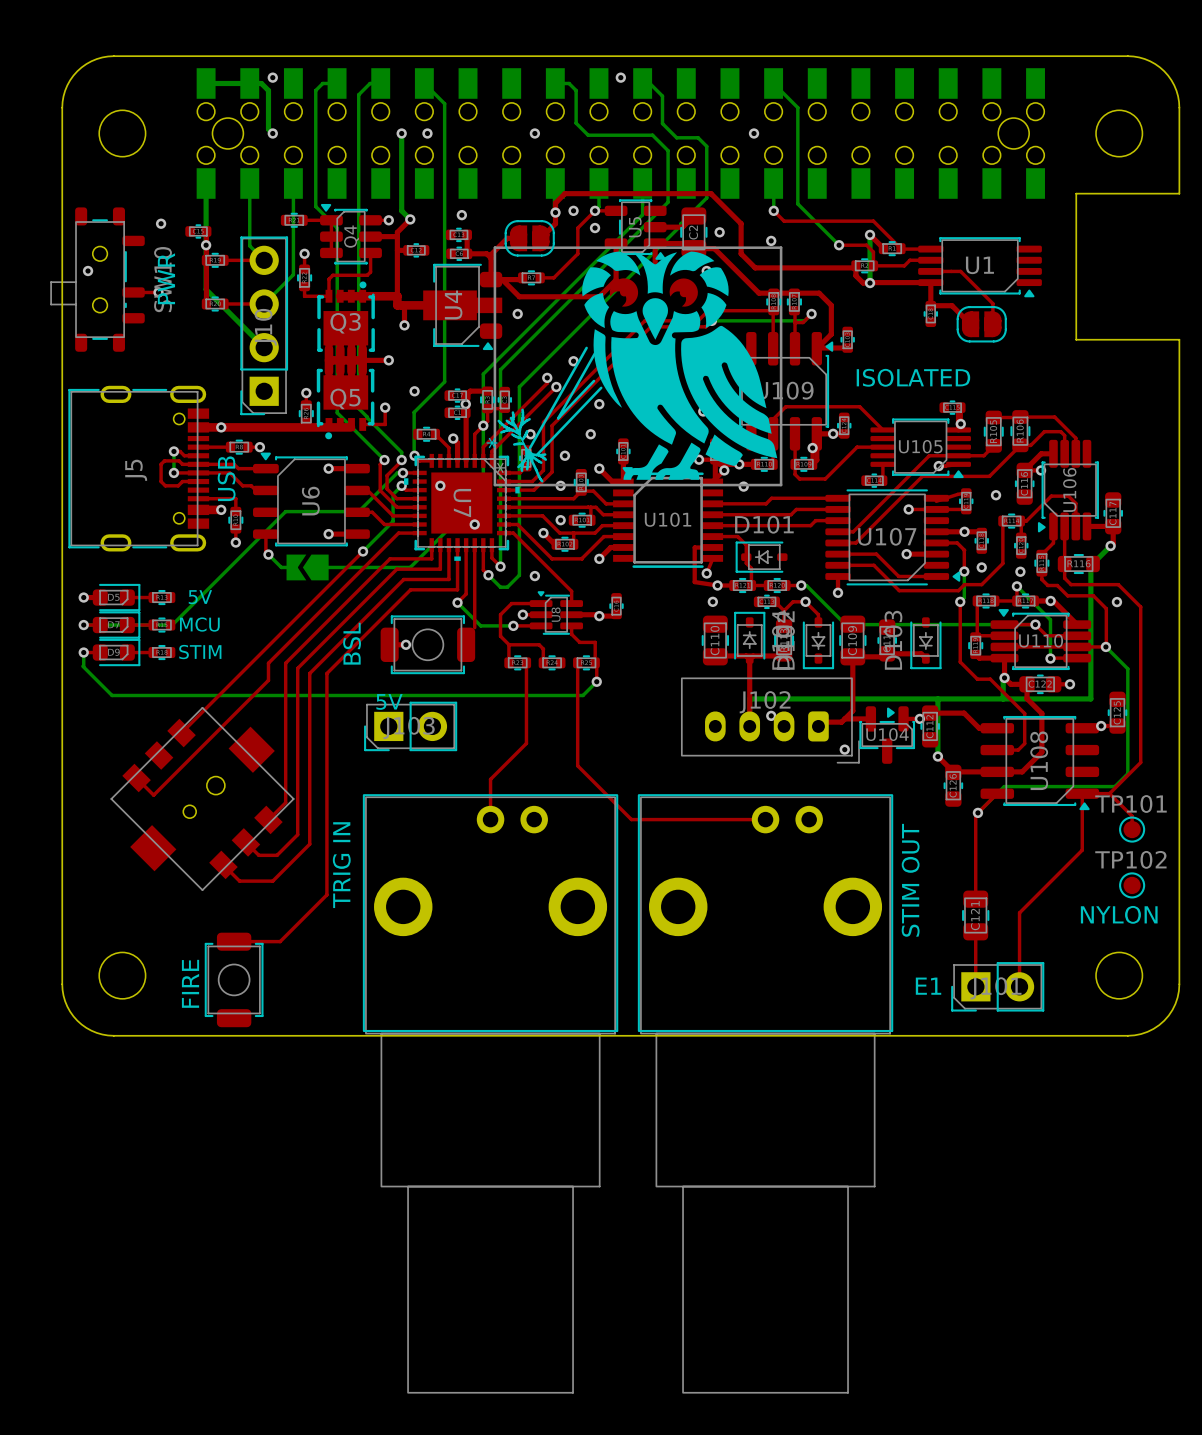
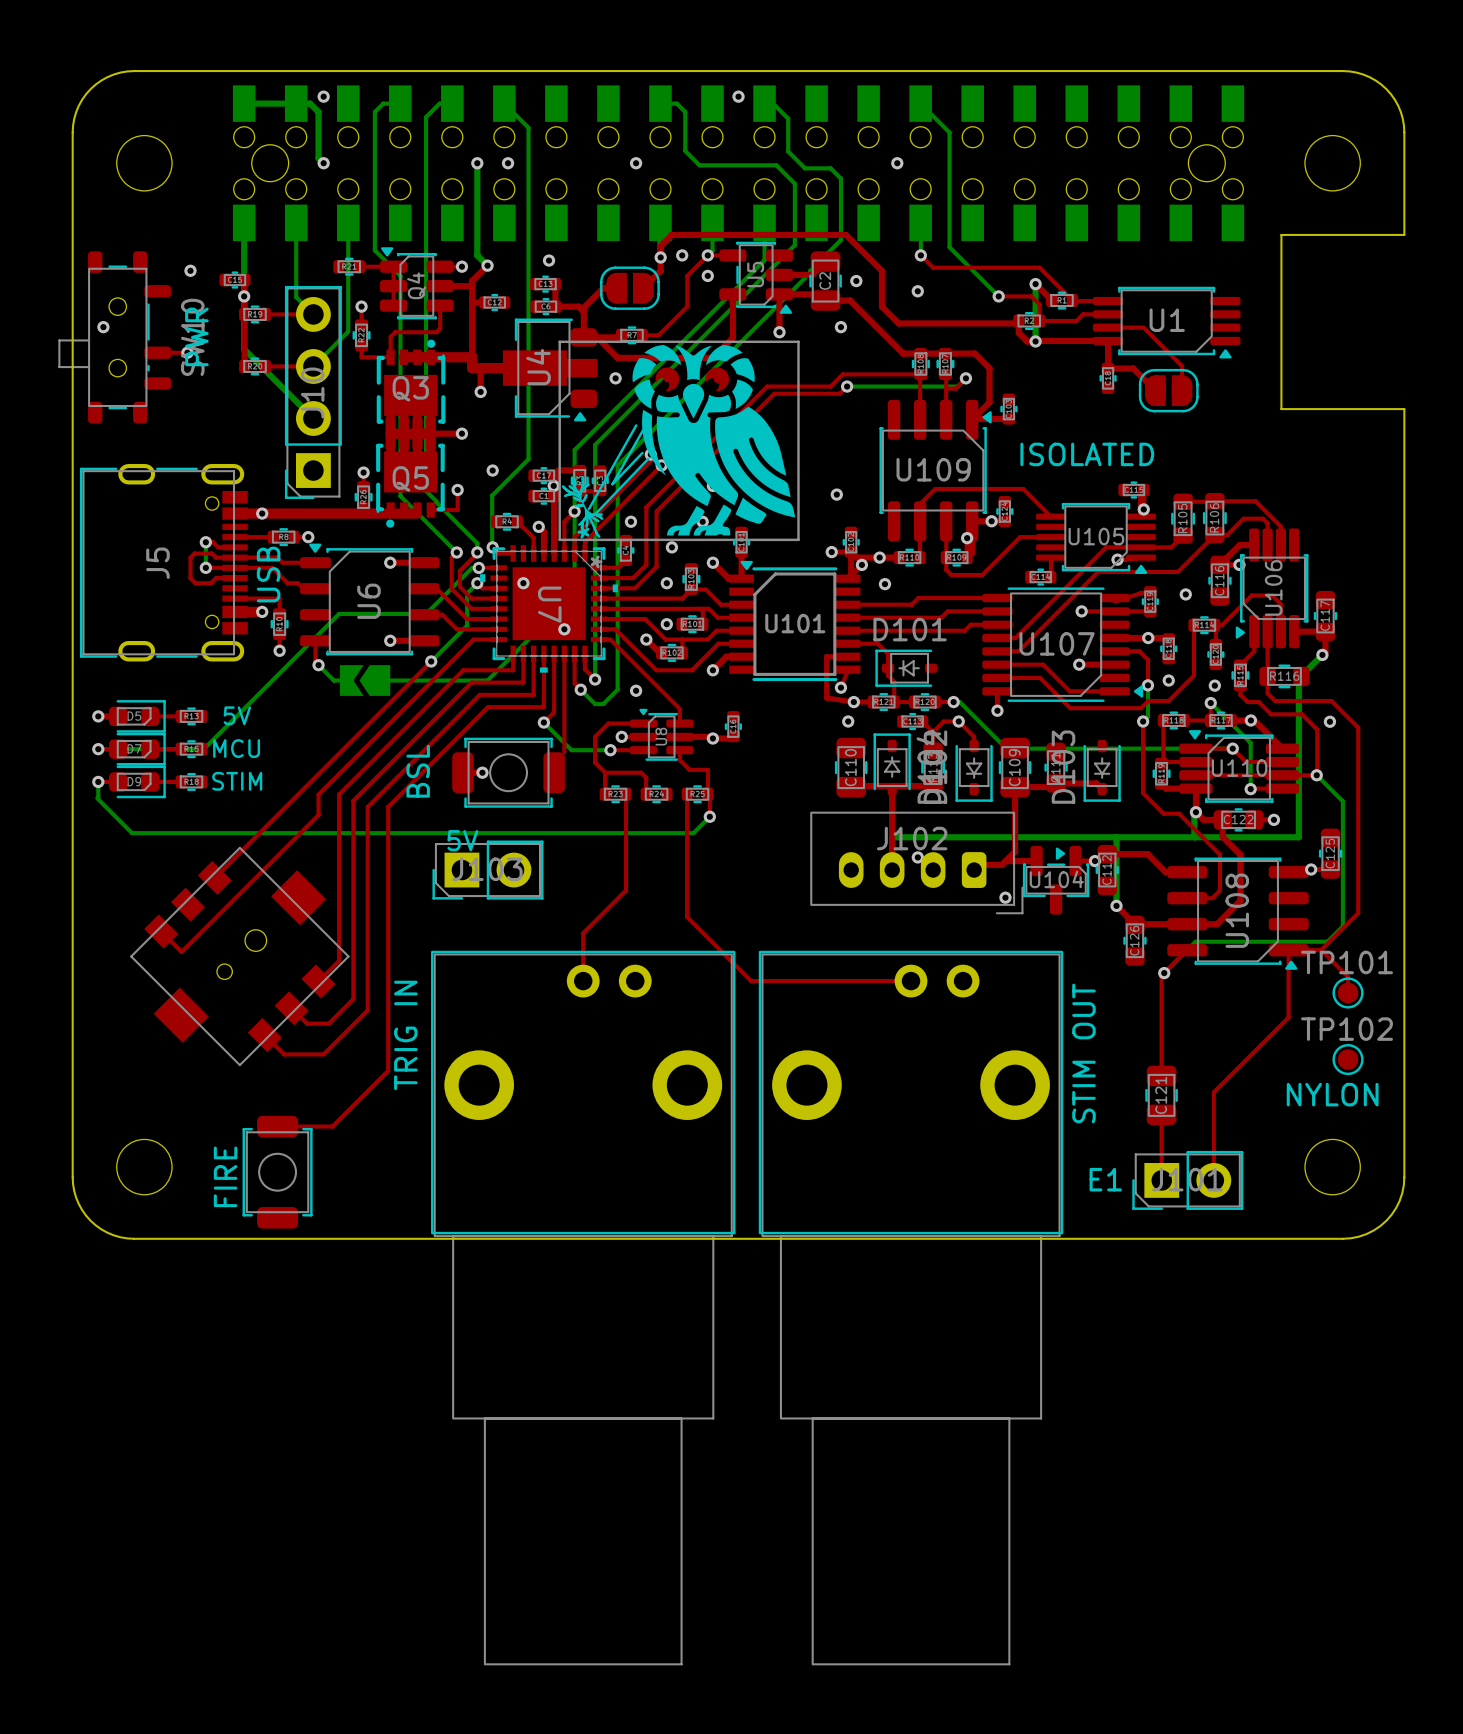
part: none -> (679, 440)
part: (638, 366) -> none

